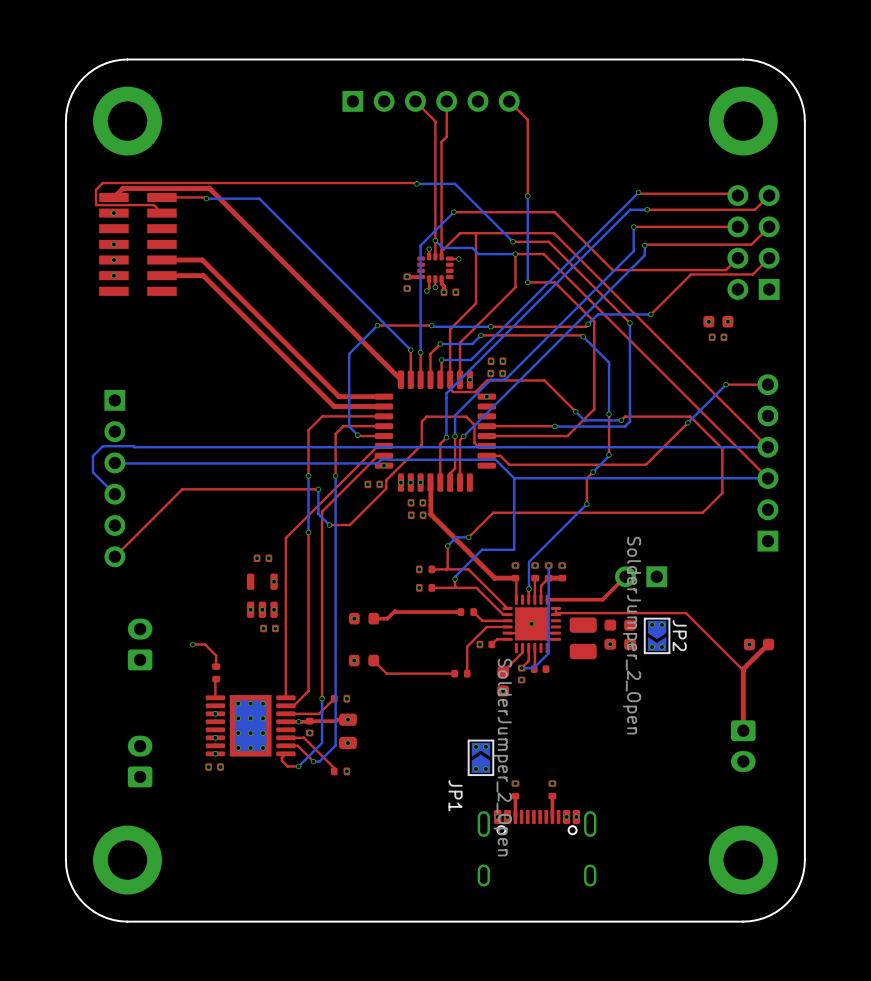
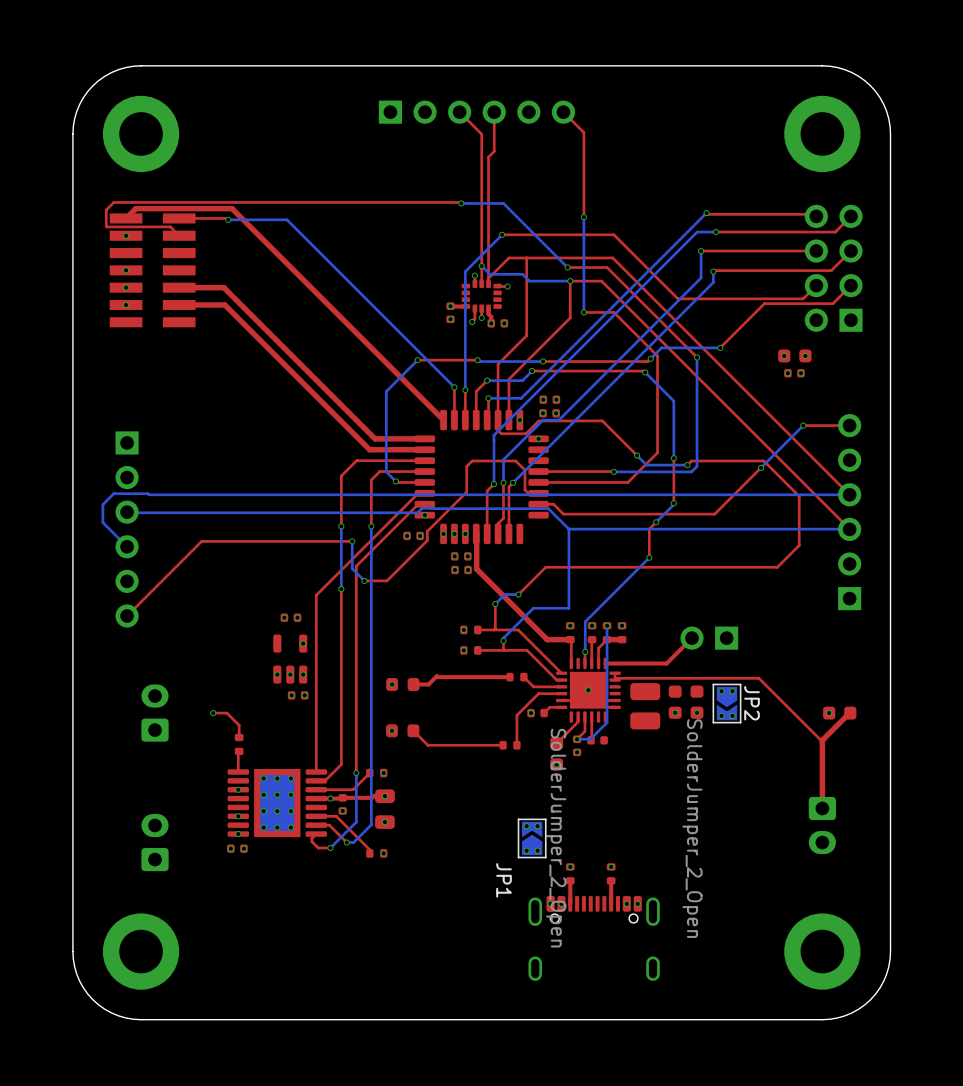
JP2 value position: SolderJumper_2_Open (632, 635) -> SolderJumper_2_Open (692, 828)

